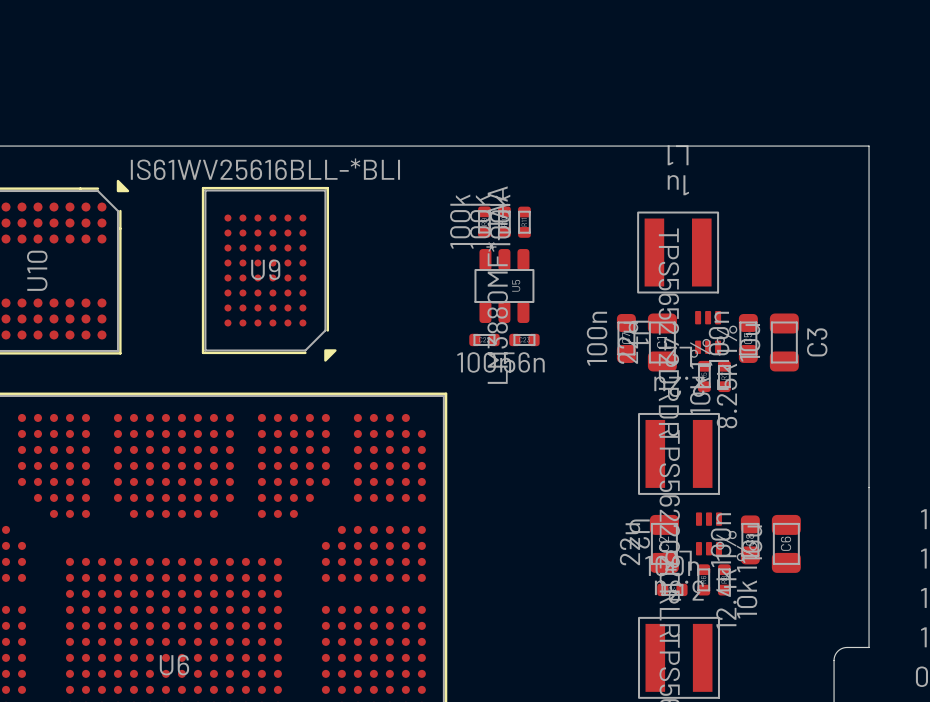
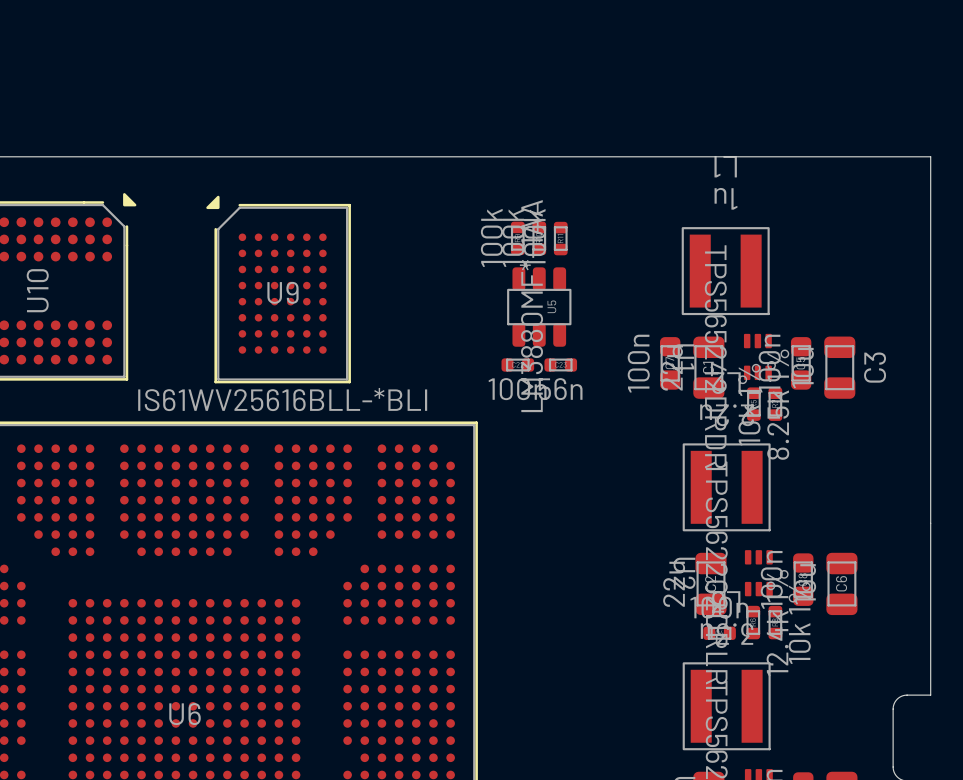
U9 rotation: 0° (269, 274) -> 180° (278, 289)

